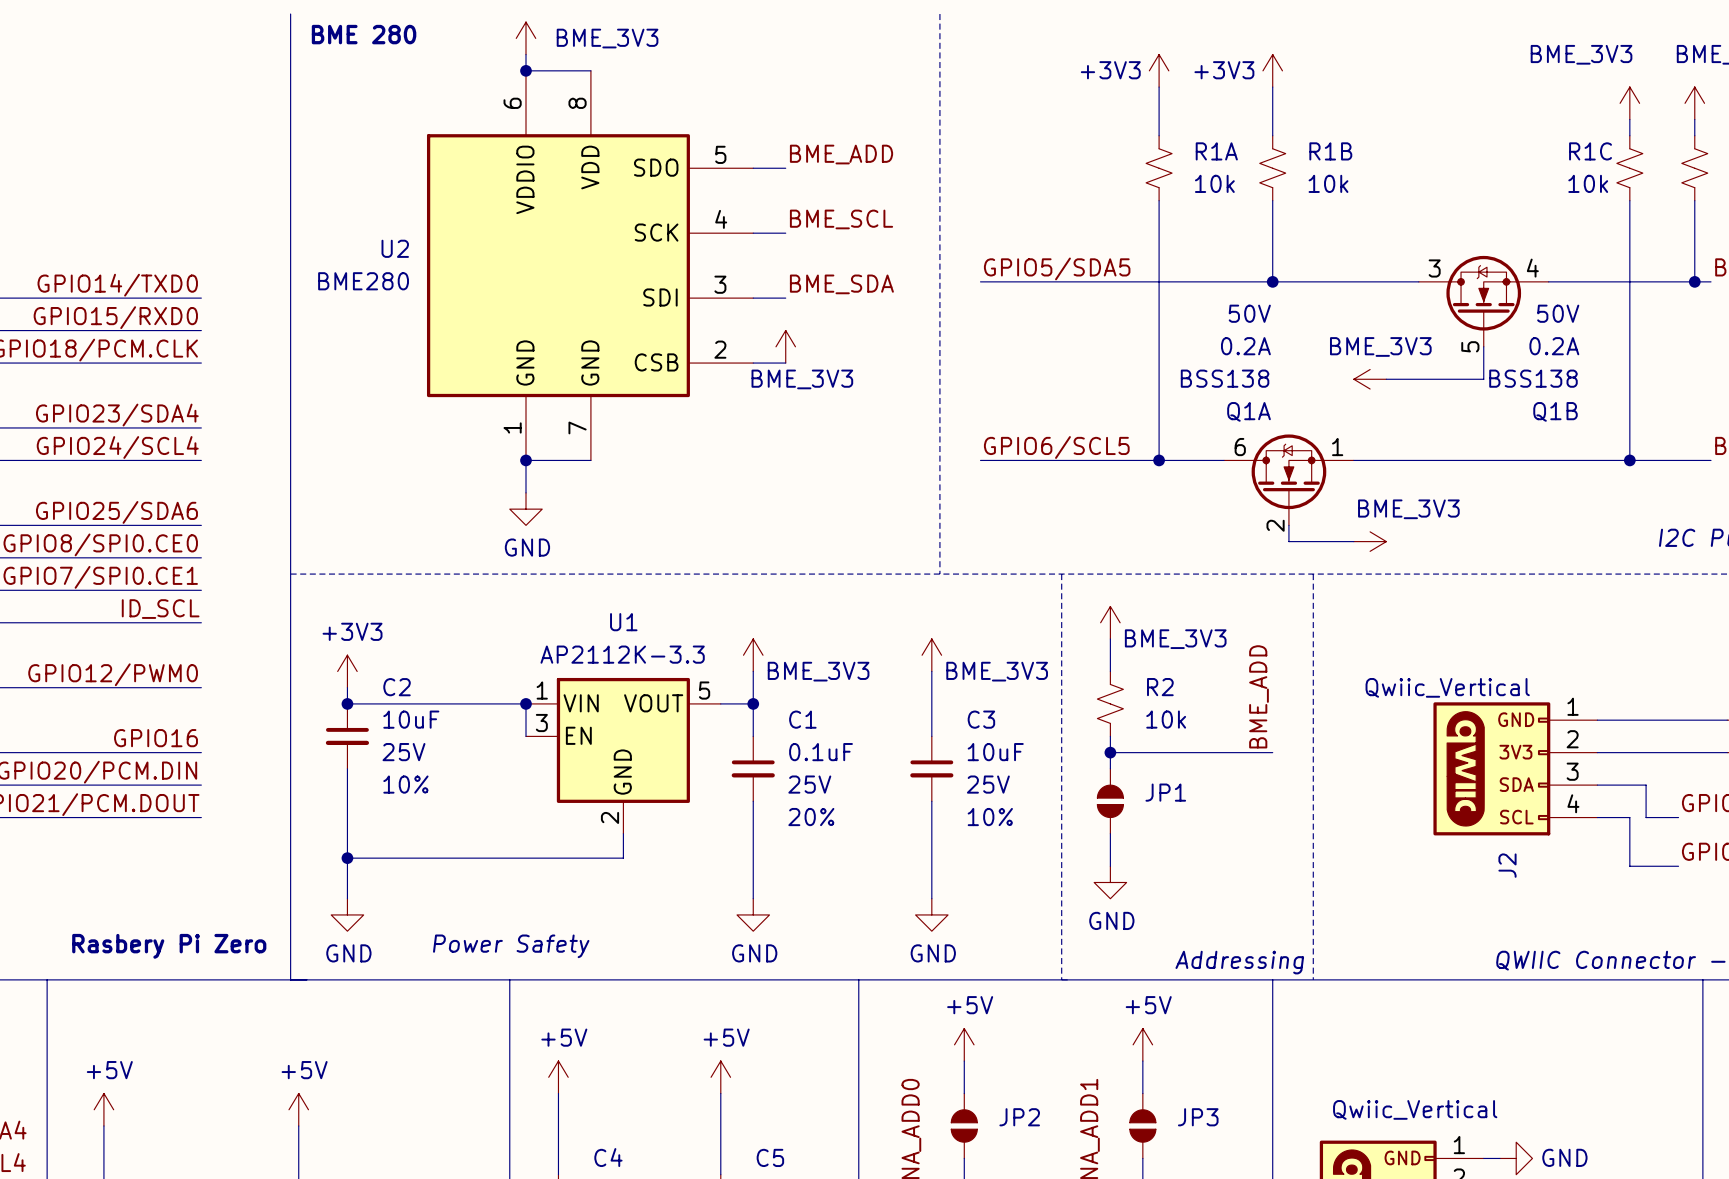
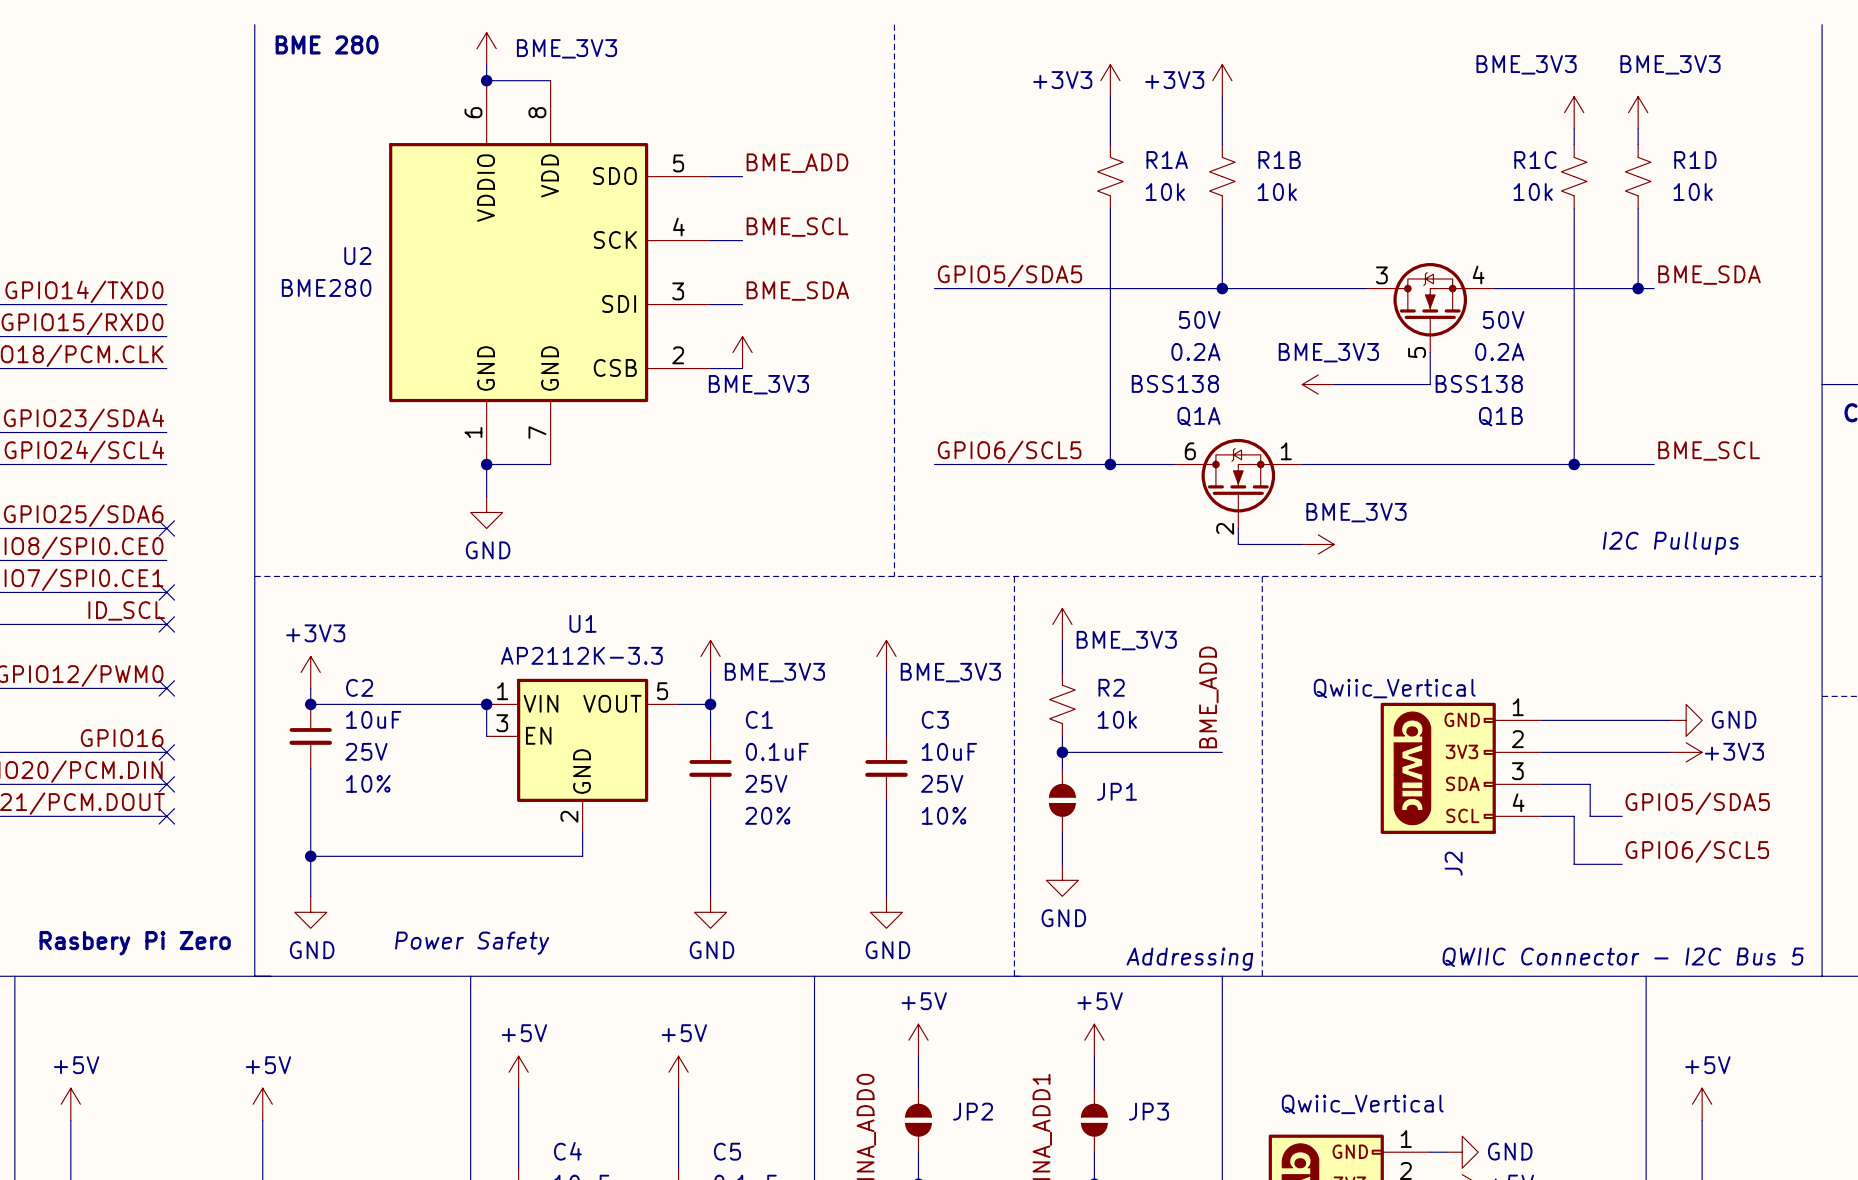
no-connect mark: none -> (166, 528)
no-connect mark: none -> (166, 592)
no-connect mark: none -> (166, 624)
no-connect mark: none -> (166, 688)
no-connect mark: none -> (166, 752)
no-connect mark: none -> (166, 784)
no-connect mark: none -> (166, 816)

